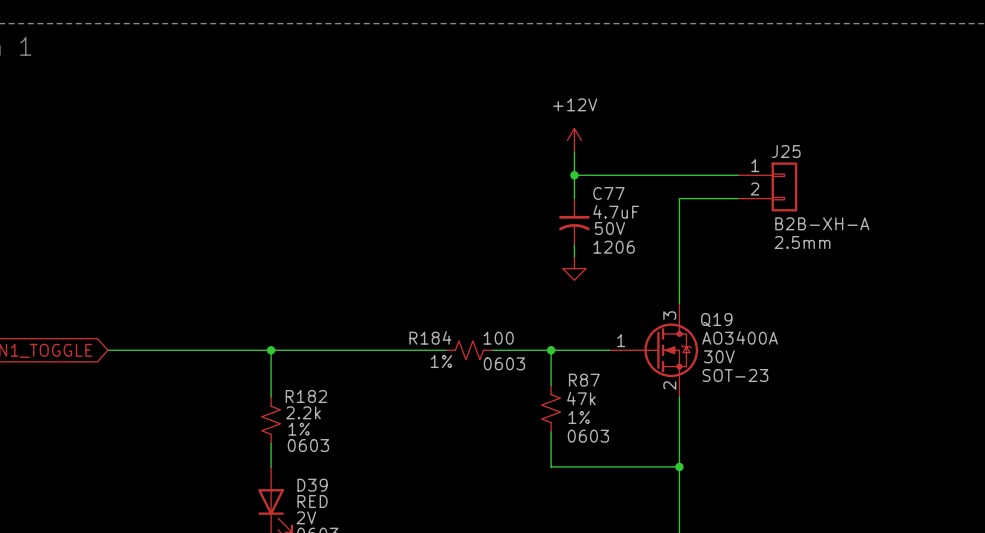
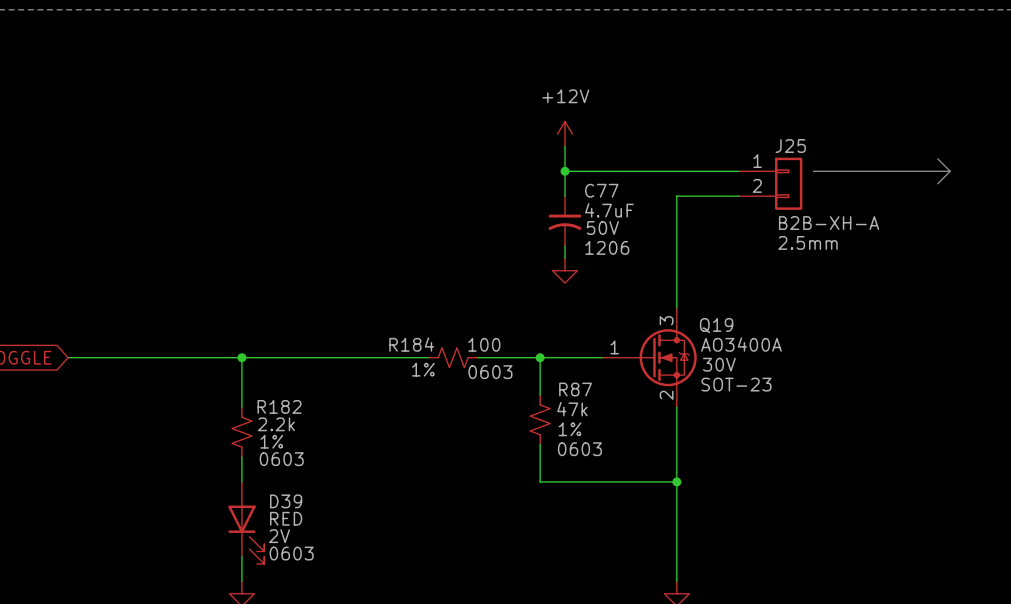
line: none -> (937, 158) (950, 171)
line: none -> (813, 171) (950, 171)
line: none -> (950, 171) (937, 183)

